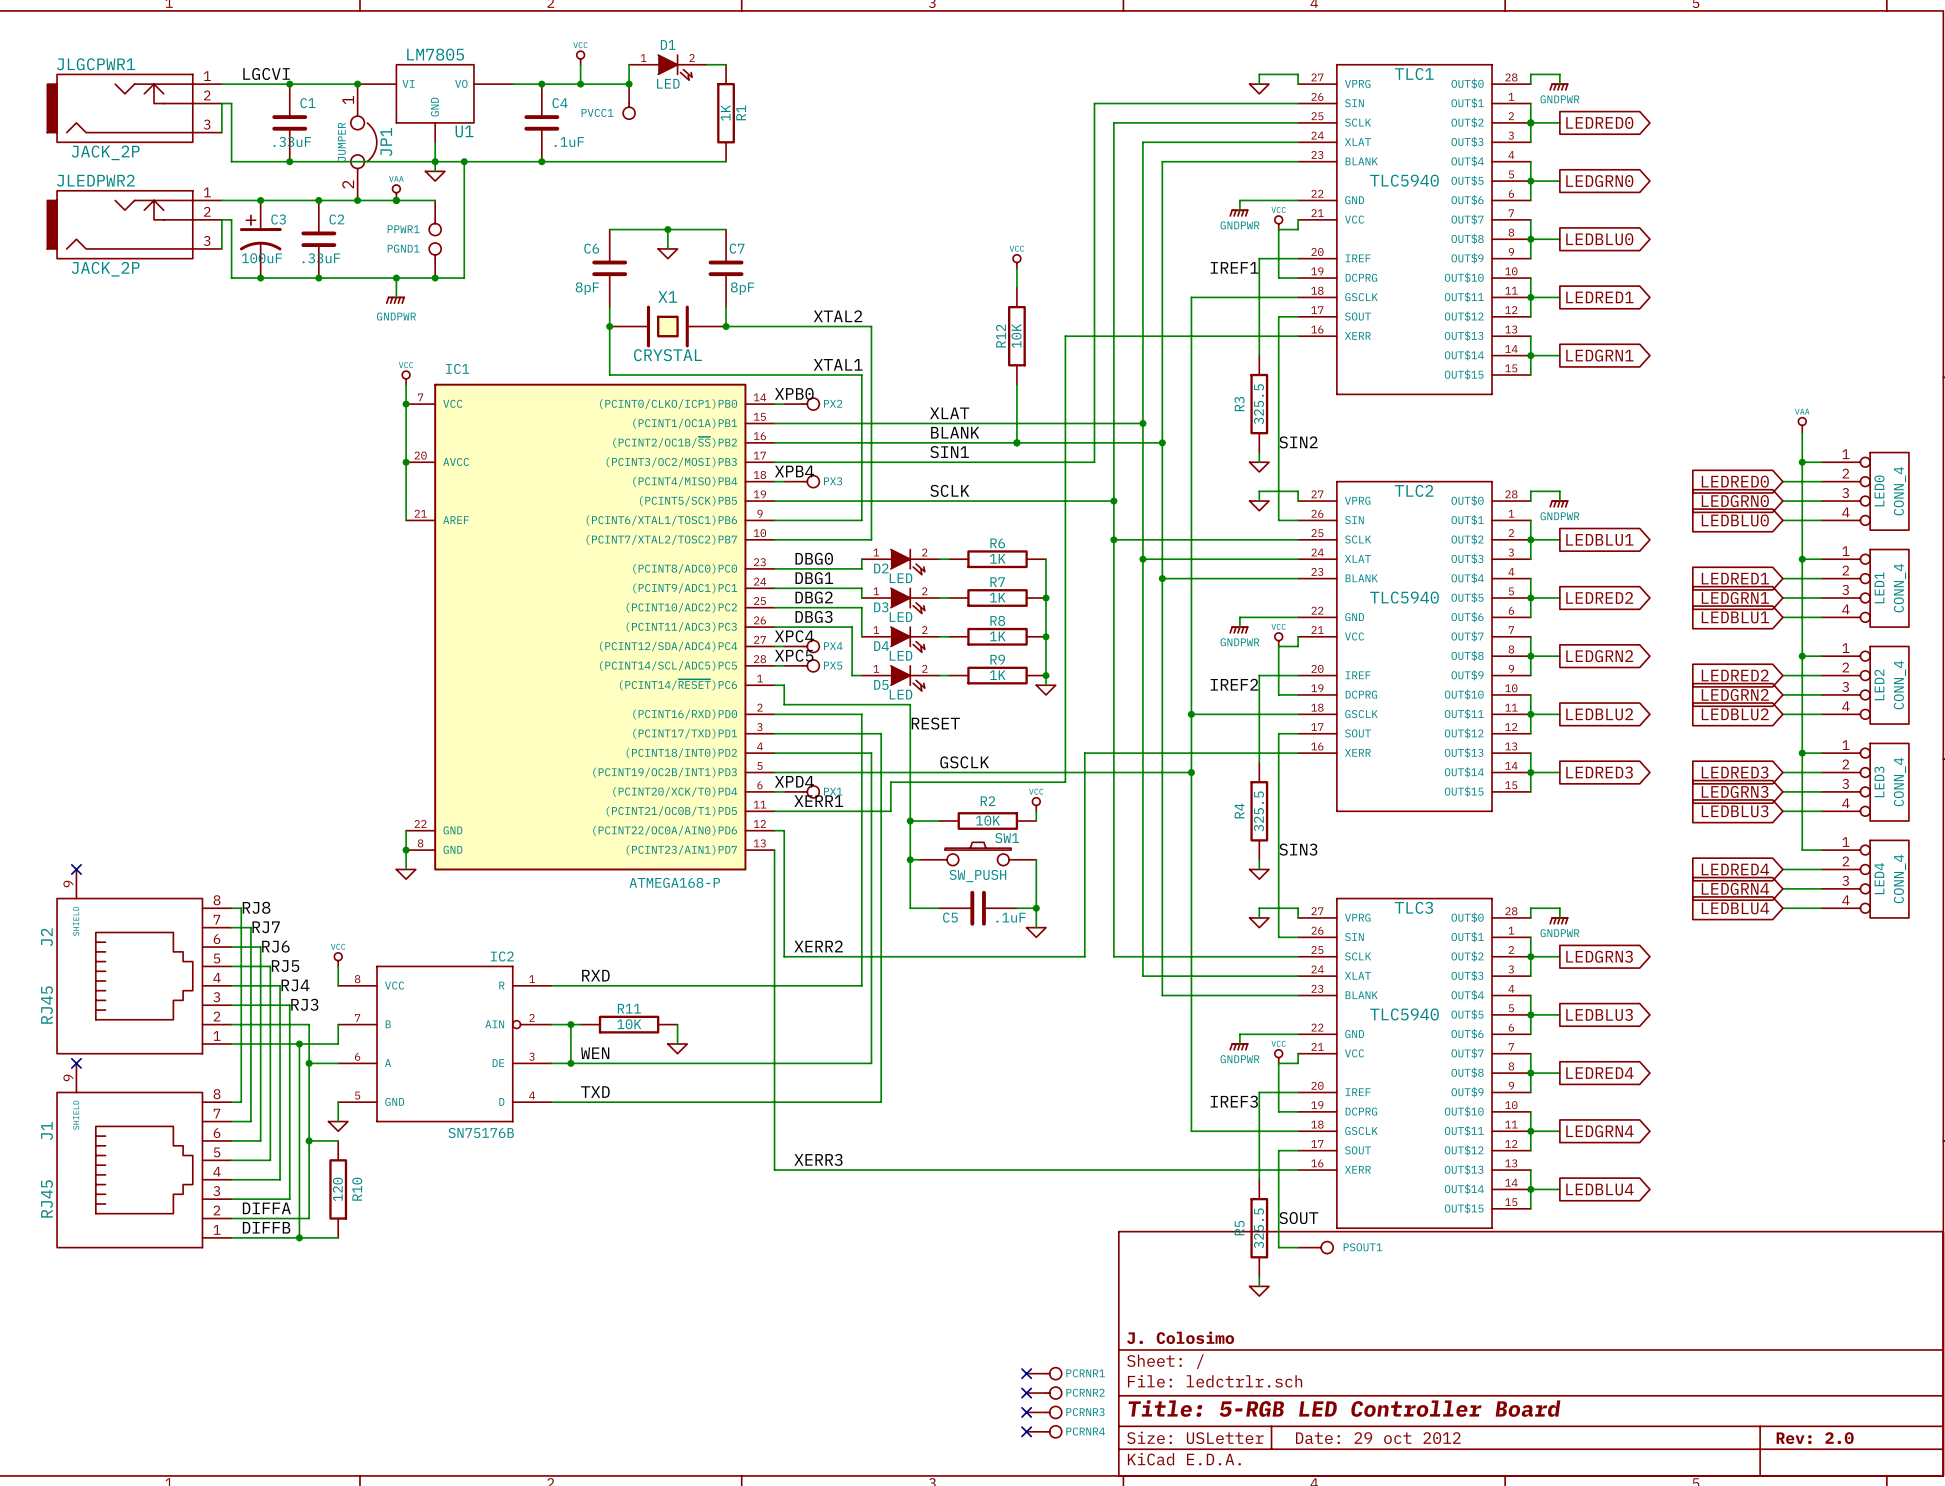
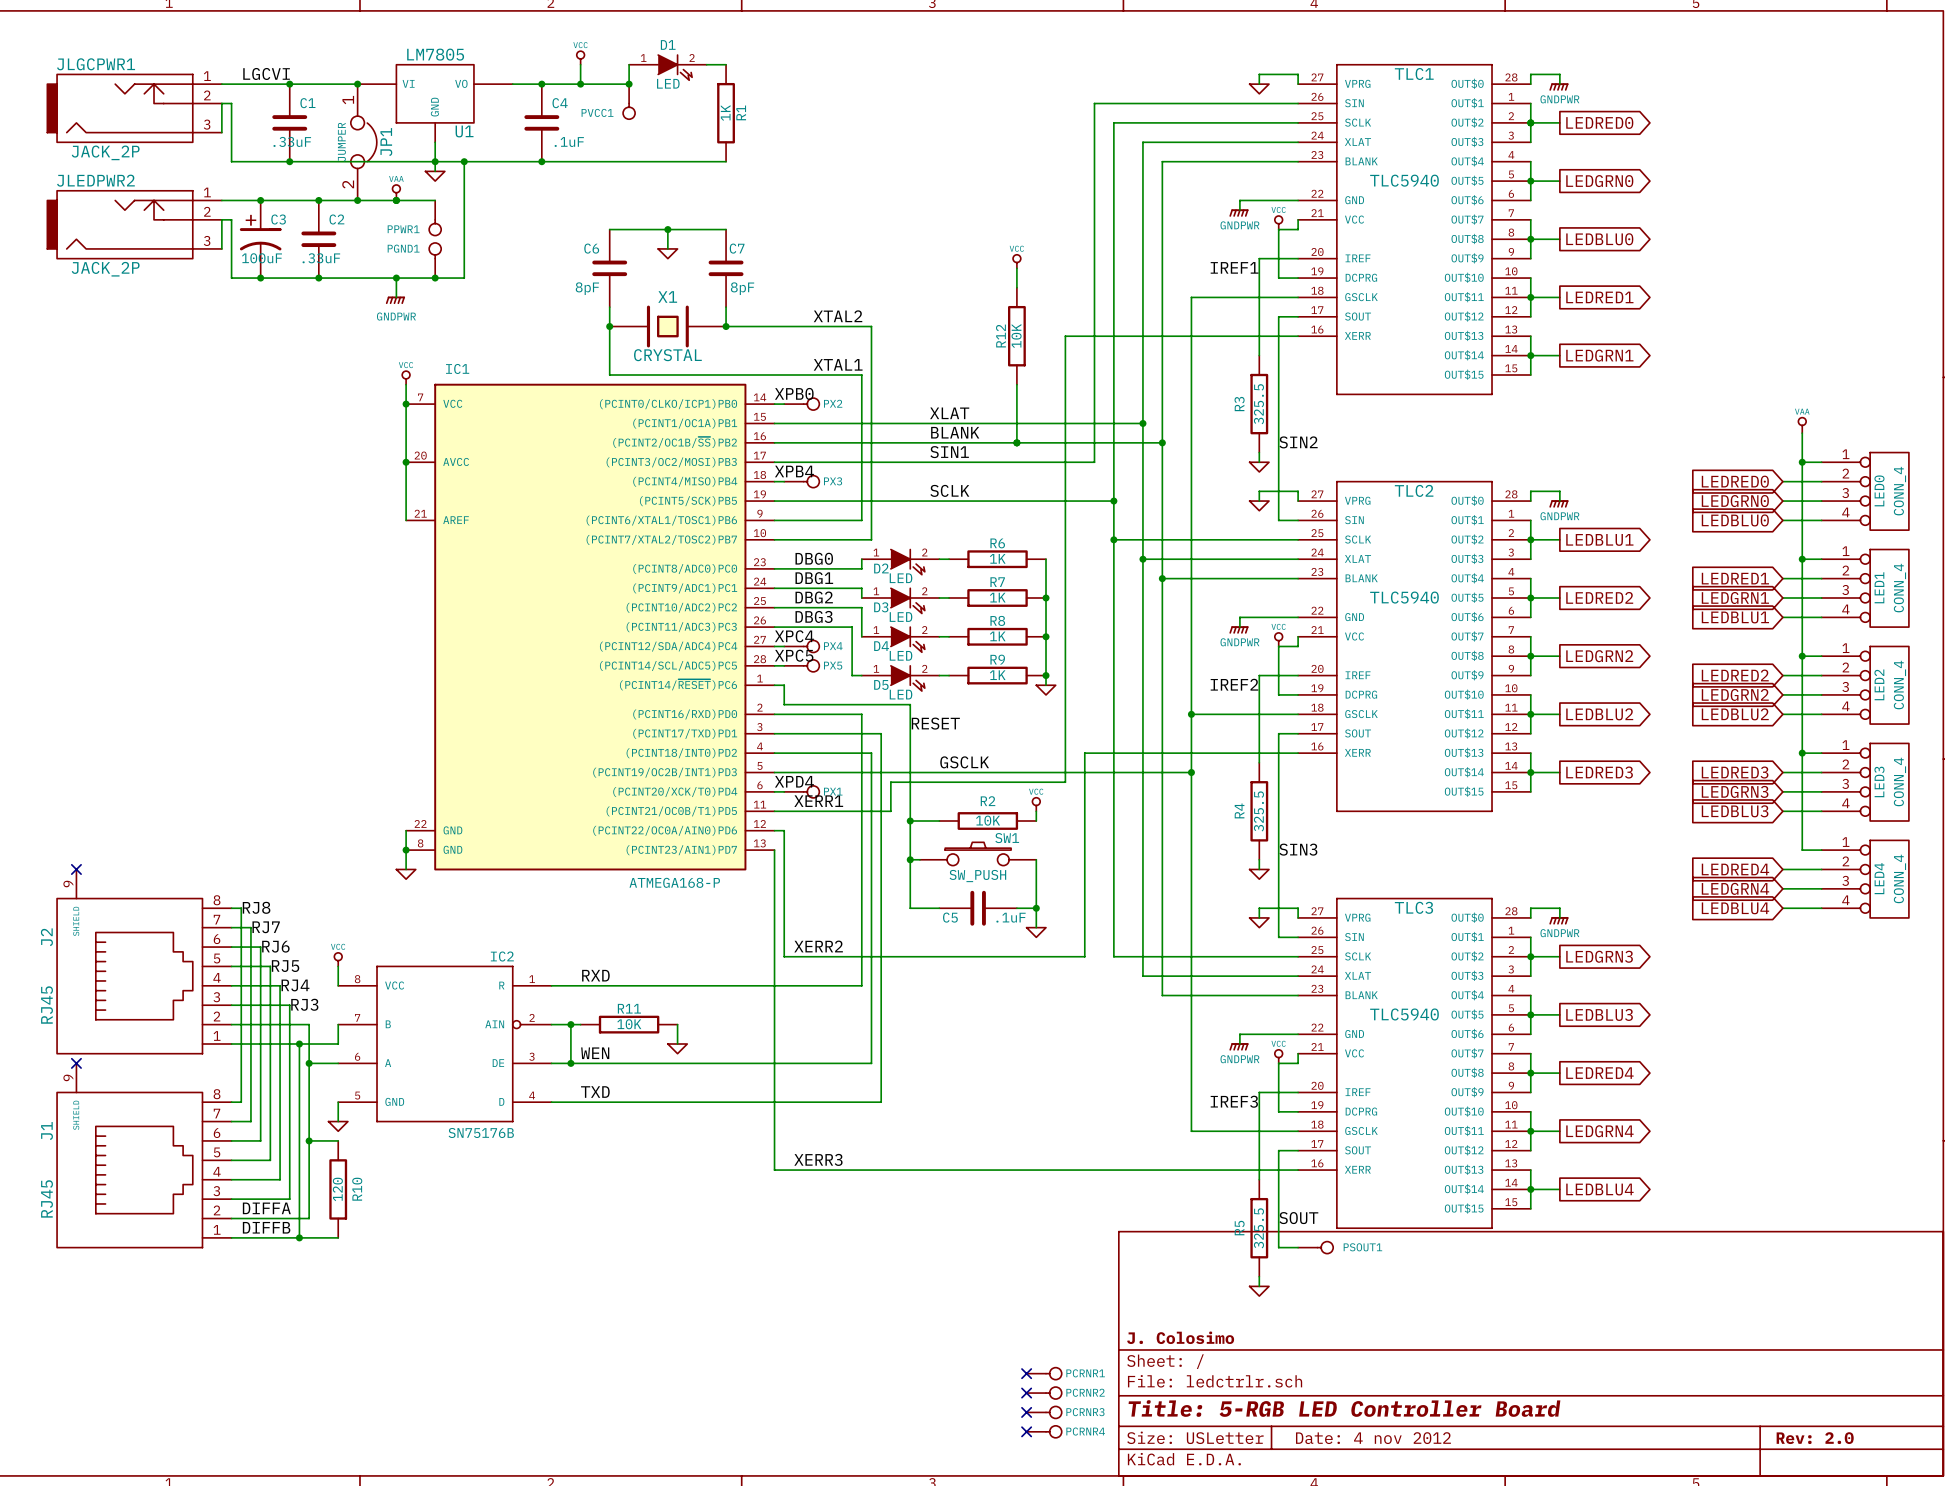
title block: Date: 29 oct 2012 (1378, 1438) -> Date: 4 nov 2012 (1373, 1438)

